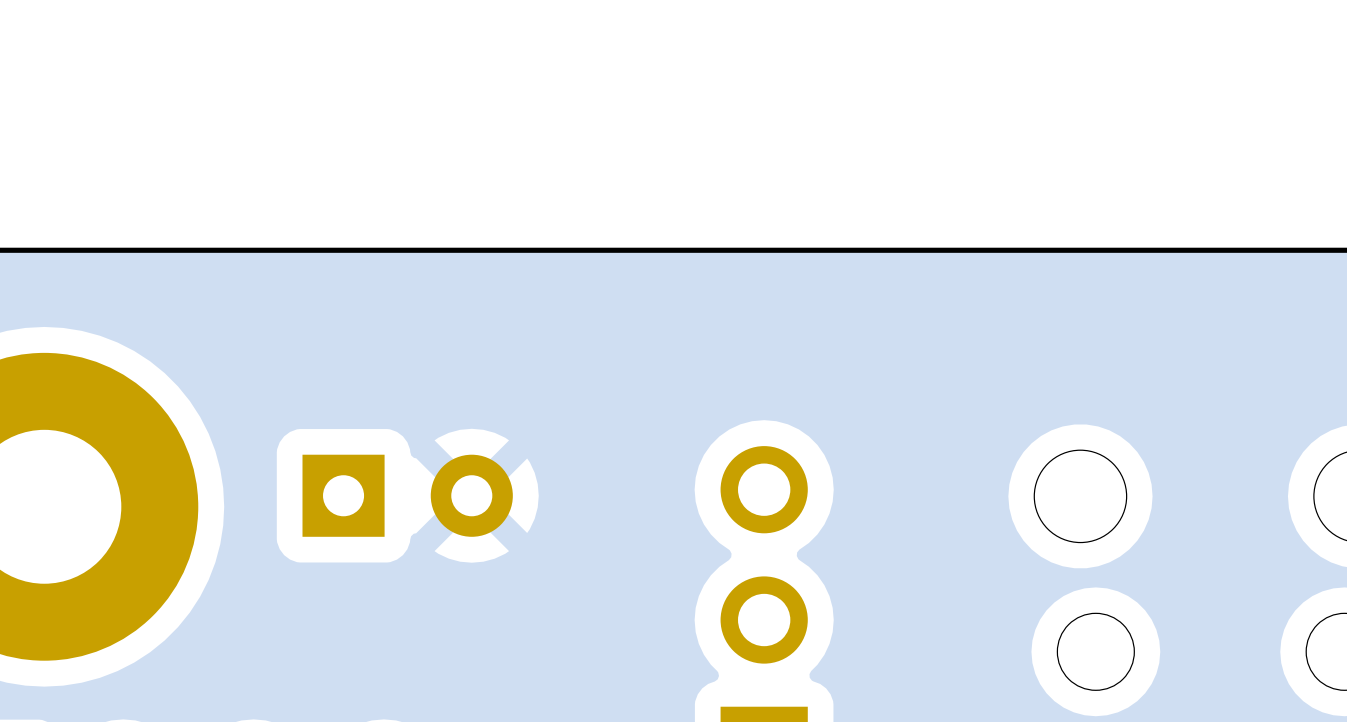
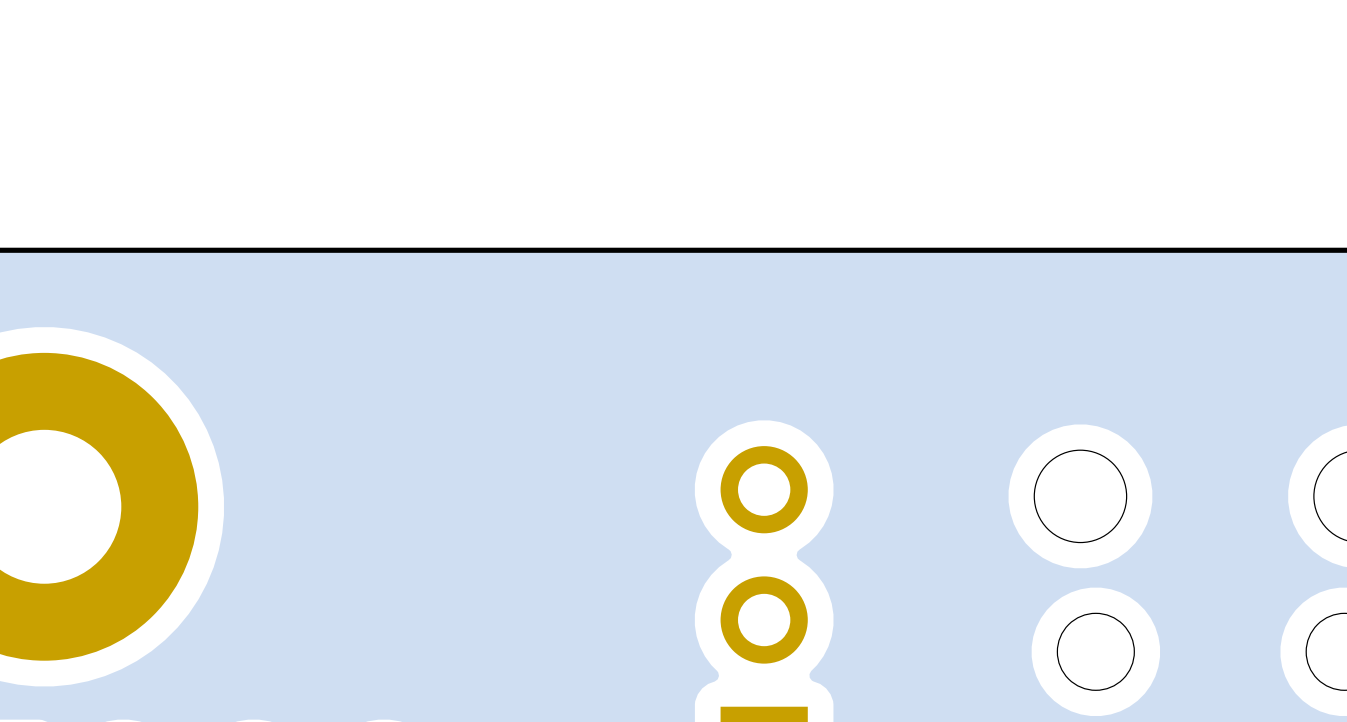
part: (407, 495) -> none

